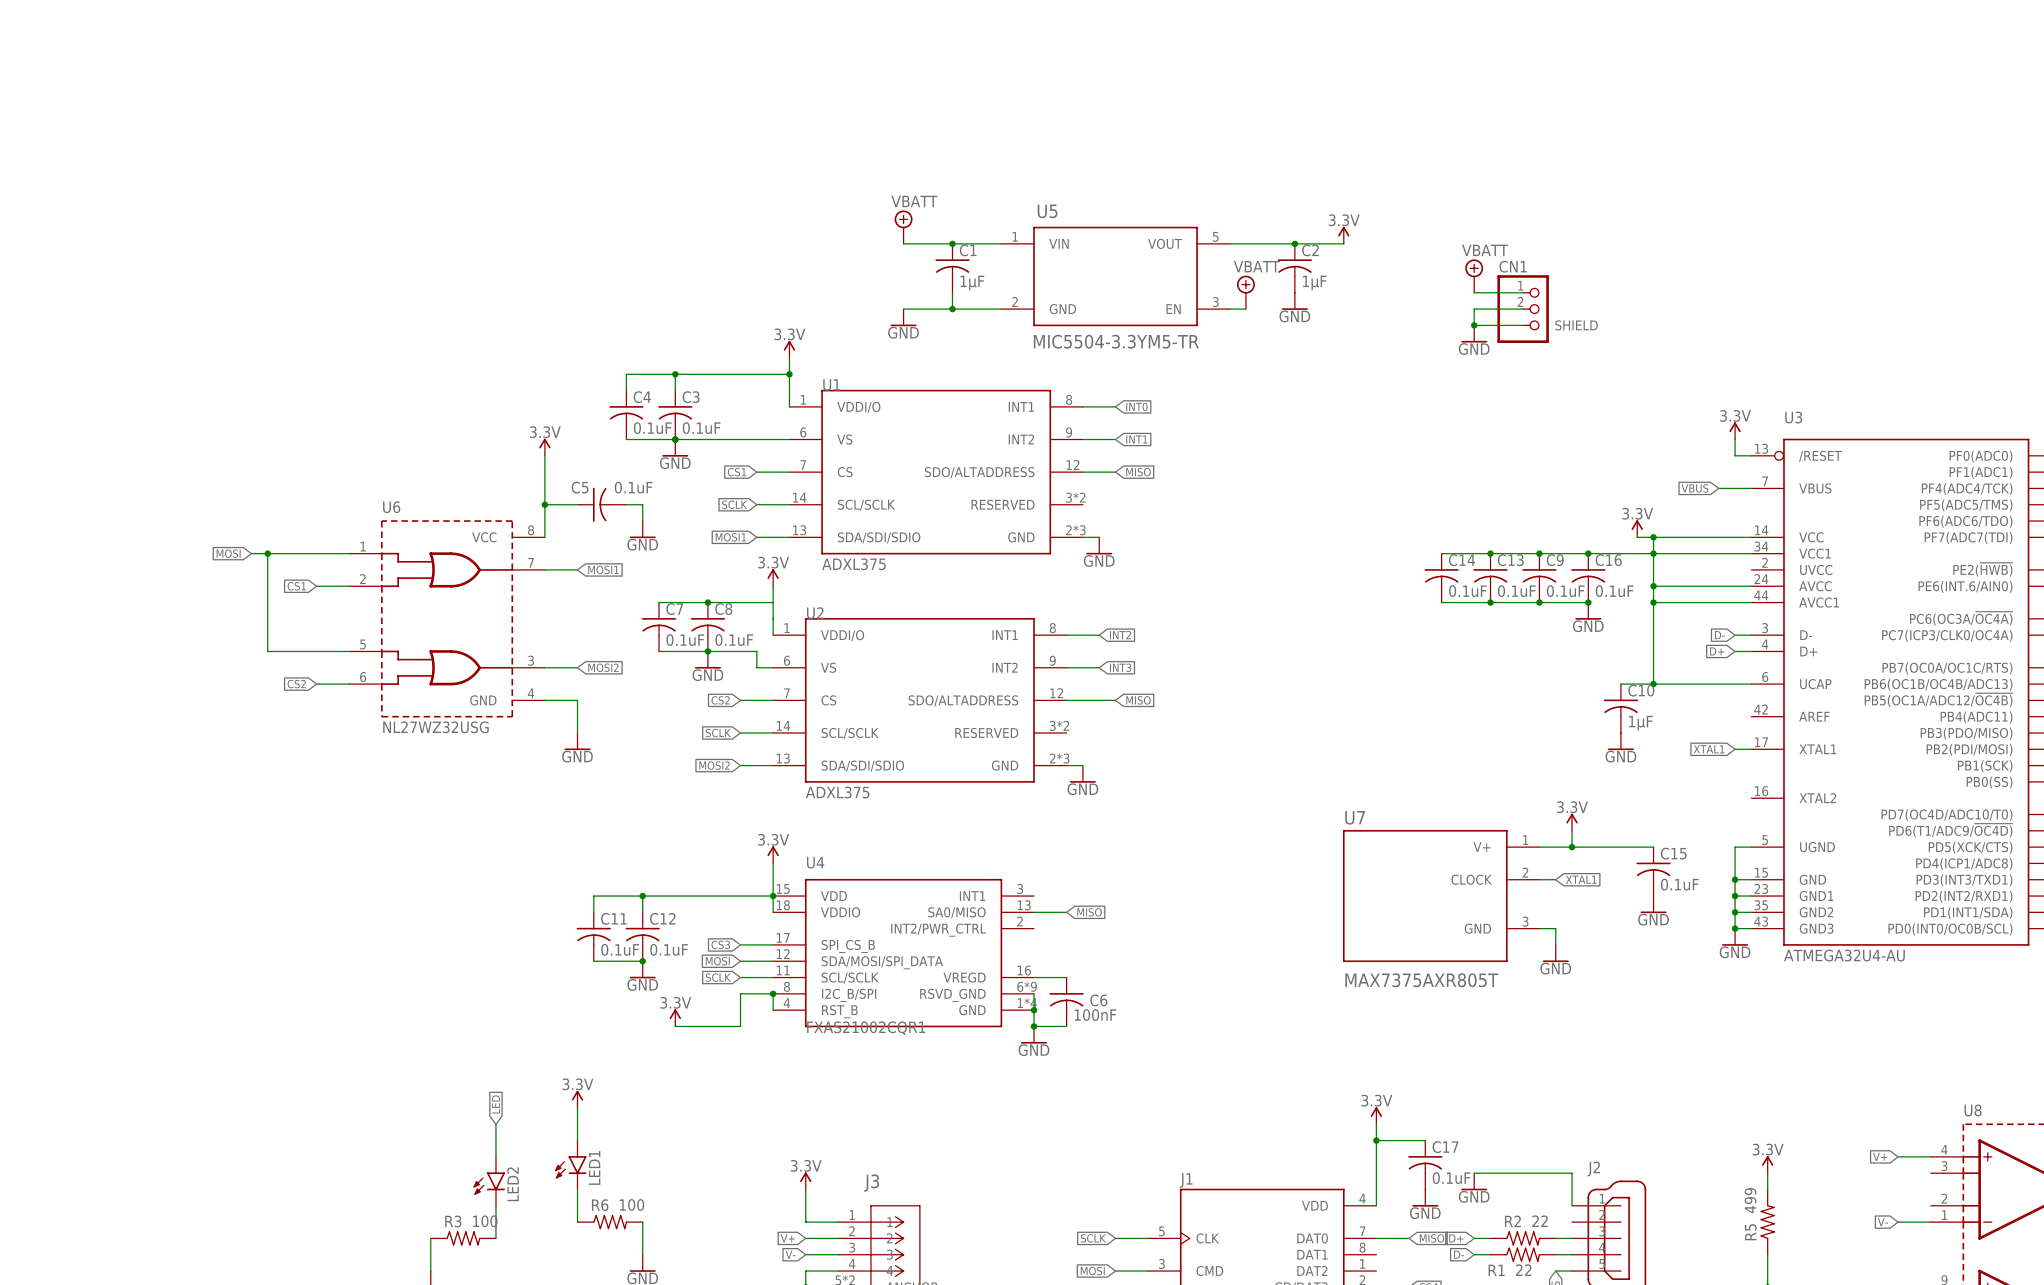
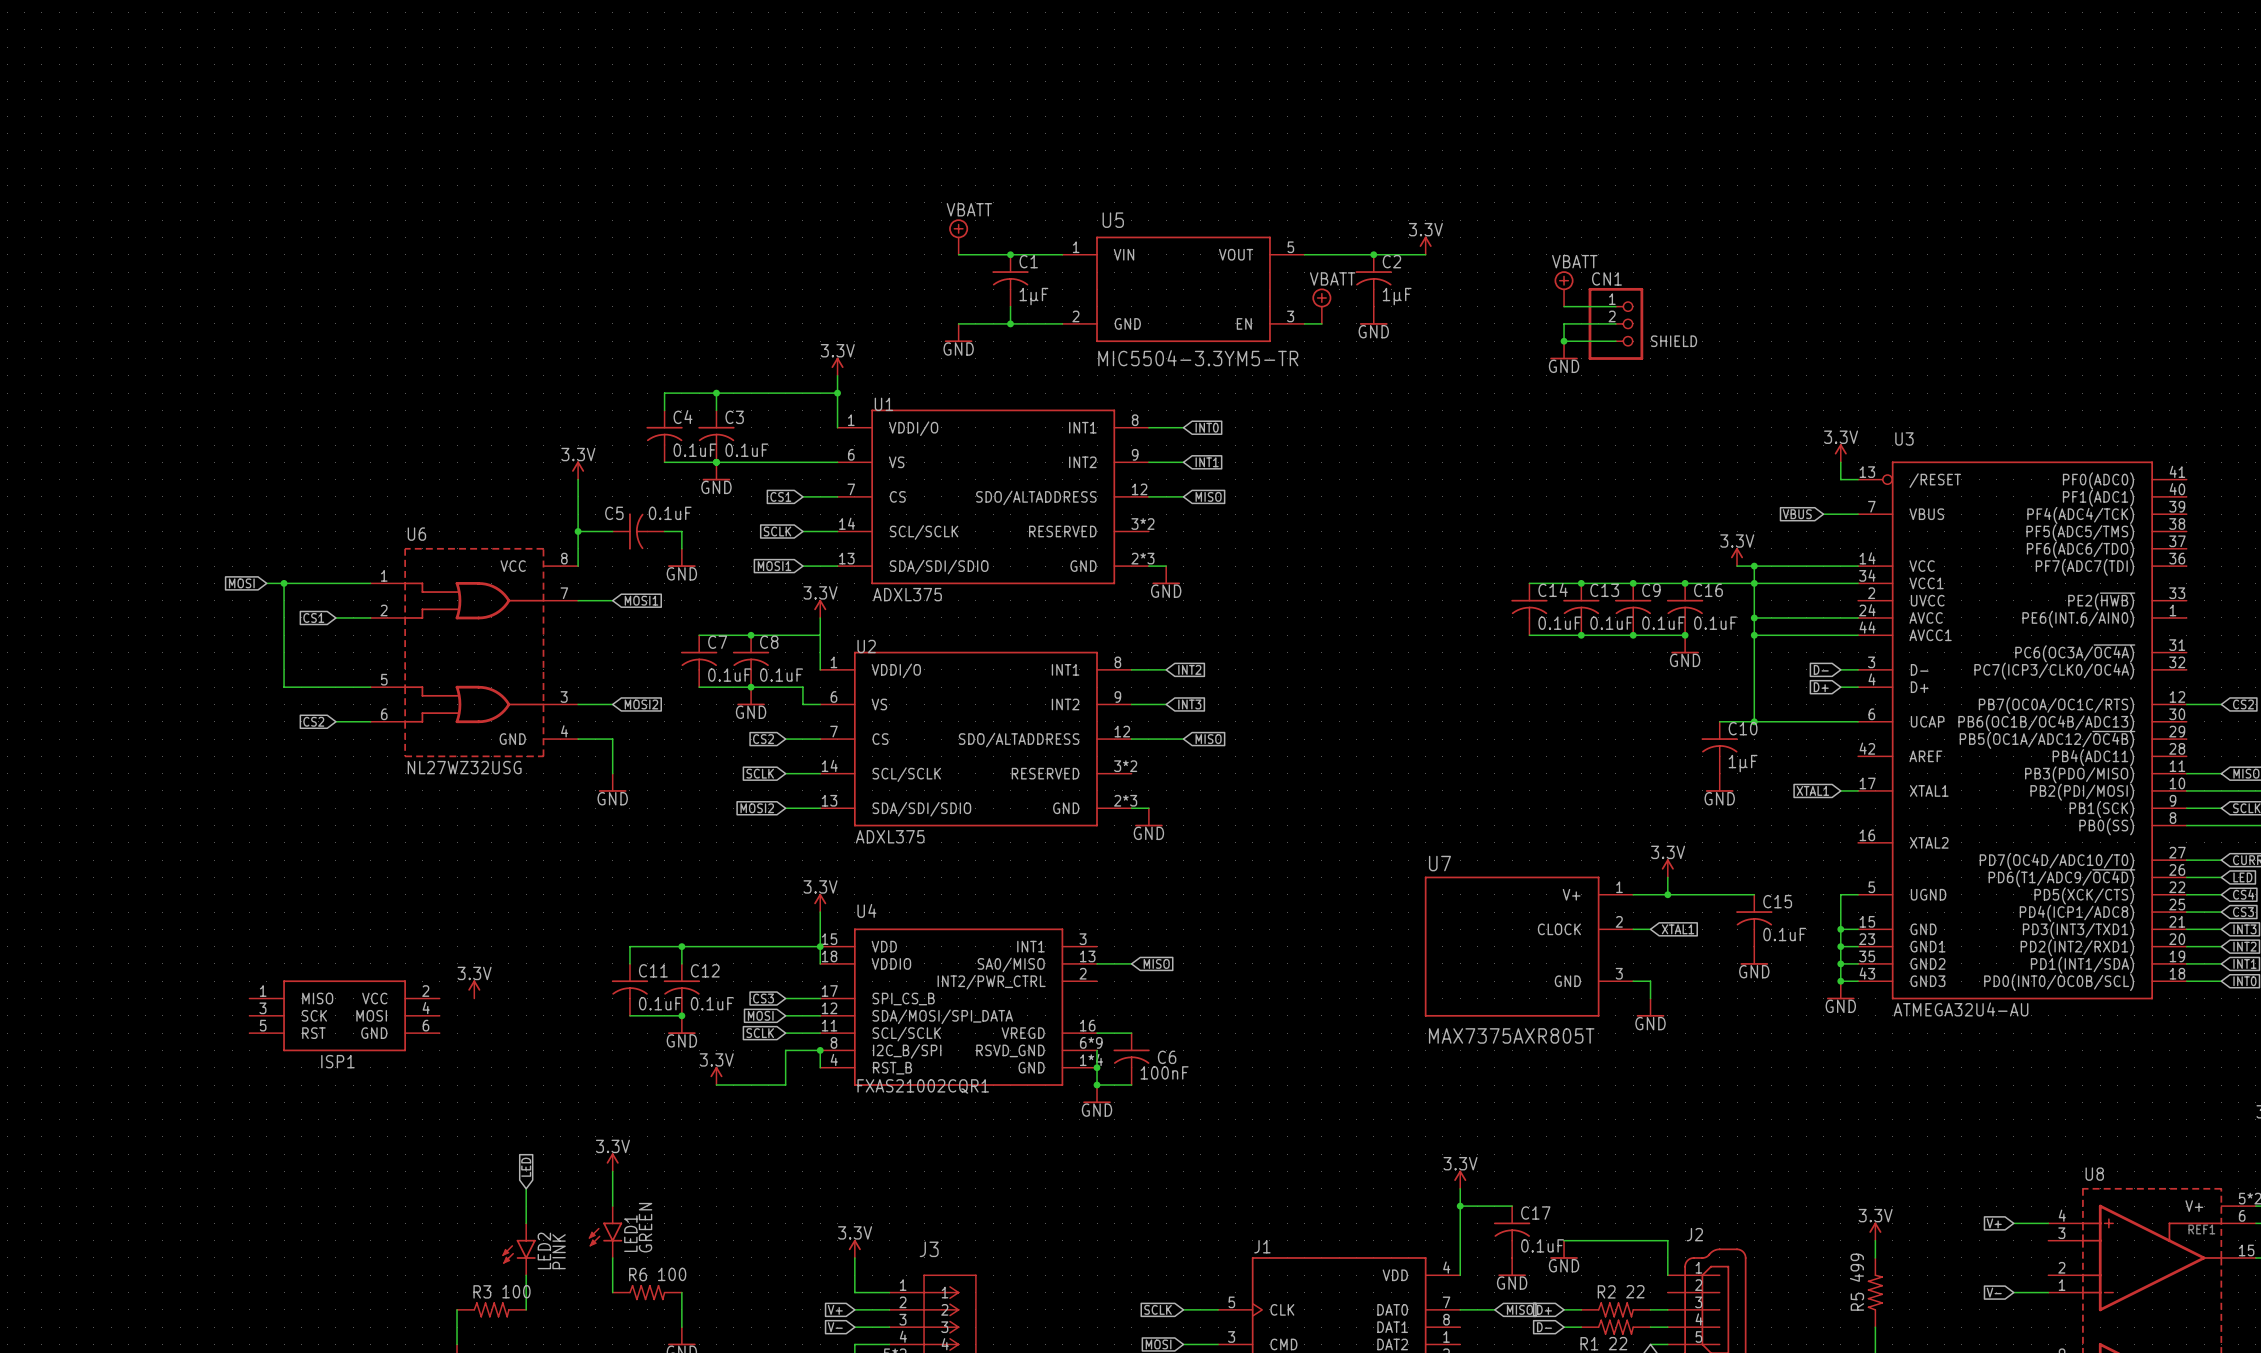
power symbol: none -> 3.3V (474, 989)
ISP1: none -> (344, 1015)
LED1 value: none -> GREEN (645, 1227)
LED2 value: none -> PINK (559, 1251)

